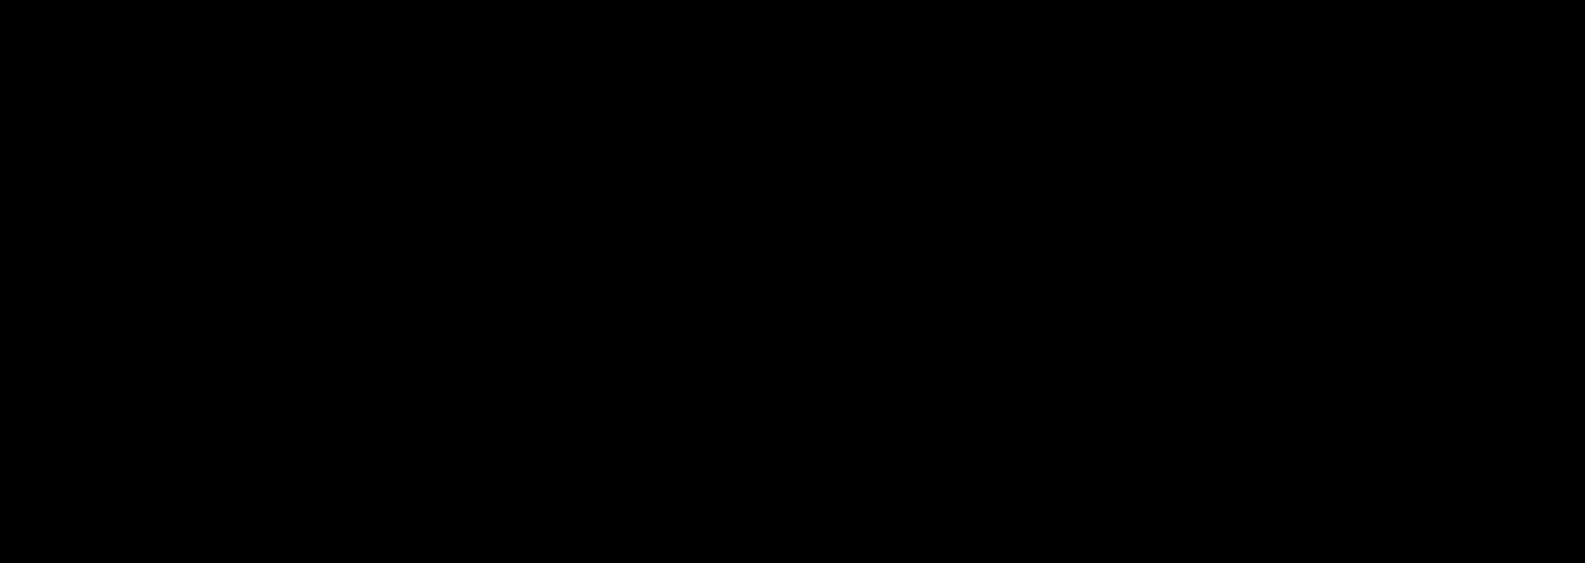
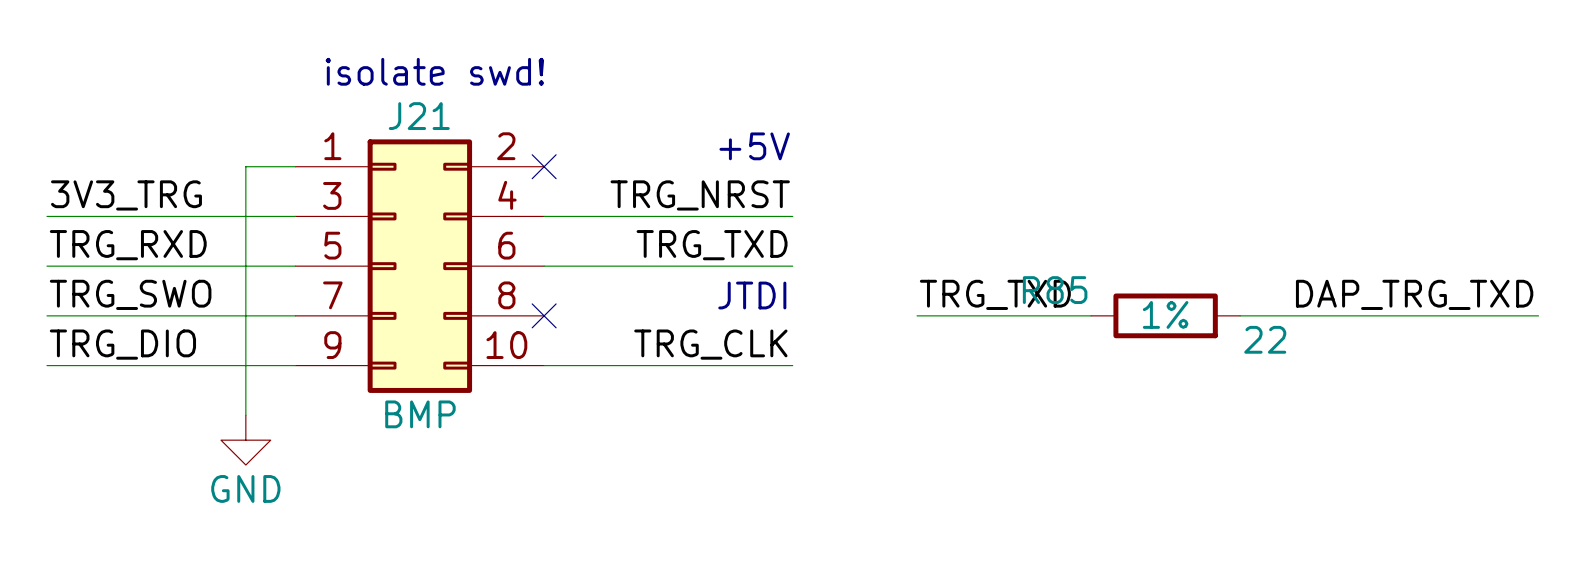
text: none -> isolate swd! (434, 71)
text: none -> +5V (754, 146)
wire: none -> (295, 166) (245, 166) (245, 415)
no-connect mark: none -> (544, 166)
label: none -> 3V3_TRG (126, 195)
label: none -> TRG_NRST (700, 195)
wire: none -> (46, 216) (295, 216)
wire: none -> (544, 216) (792, 216)
label: none -> TRG_RXD (128, 245)
label: none -> TRG_TXD (712, 245)
wire: none -> (46, 266) (295, 266)
J21: none -> BMP (419, 266)
wire: none -> (544, 266) (792, 266)
label: none -> TRG_SWO (130, 294)
label: none -> TRG_TXD (995, 294)
label: none -> DAP_TRG_TXD (1414, 294)
text: none -> JTDI (752, 295)
wire: none -> (46, 315) (295, 315)
no-connect mark: none -> (544, 315)
wire: none -> (917, 315) (1091, 315)
R85: none -> 22 (1165, 315)
wire: none -> (1240, 315) (1538, 315)
label: none -> TRG_DIO (122, 344)
label: none -> TRG_CLK (710, 344)
wire: none -> (46, 365) (295, 365)
wire: none -> (544, 365) (792, 365)
power symbol: none -> GND (245, 440)

